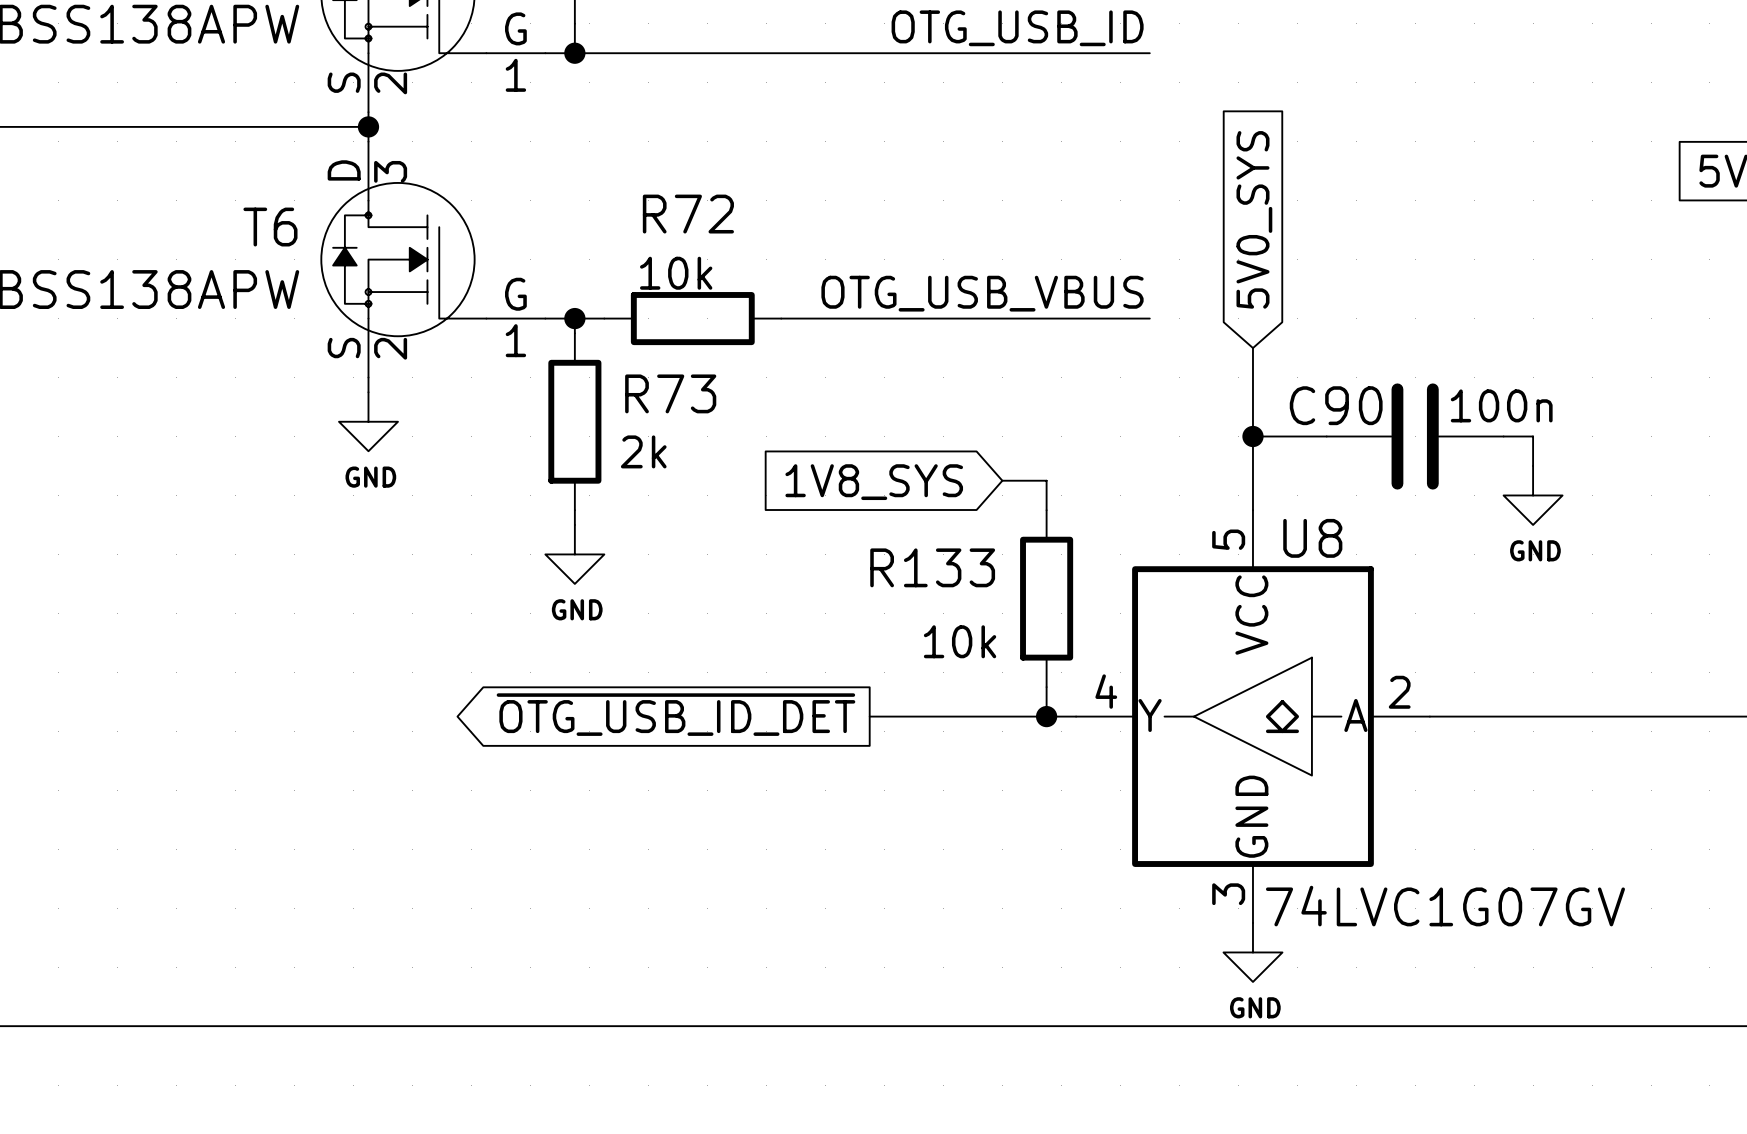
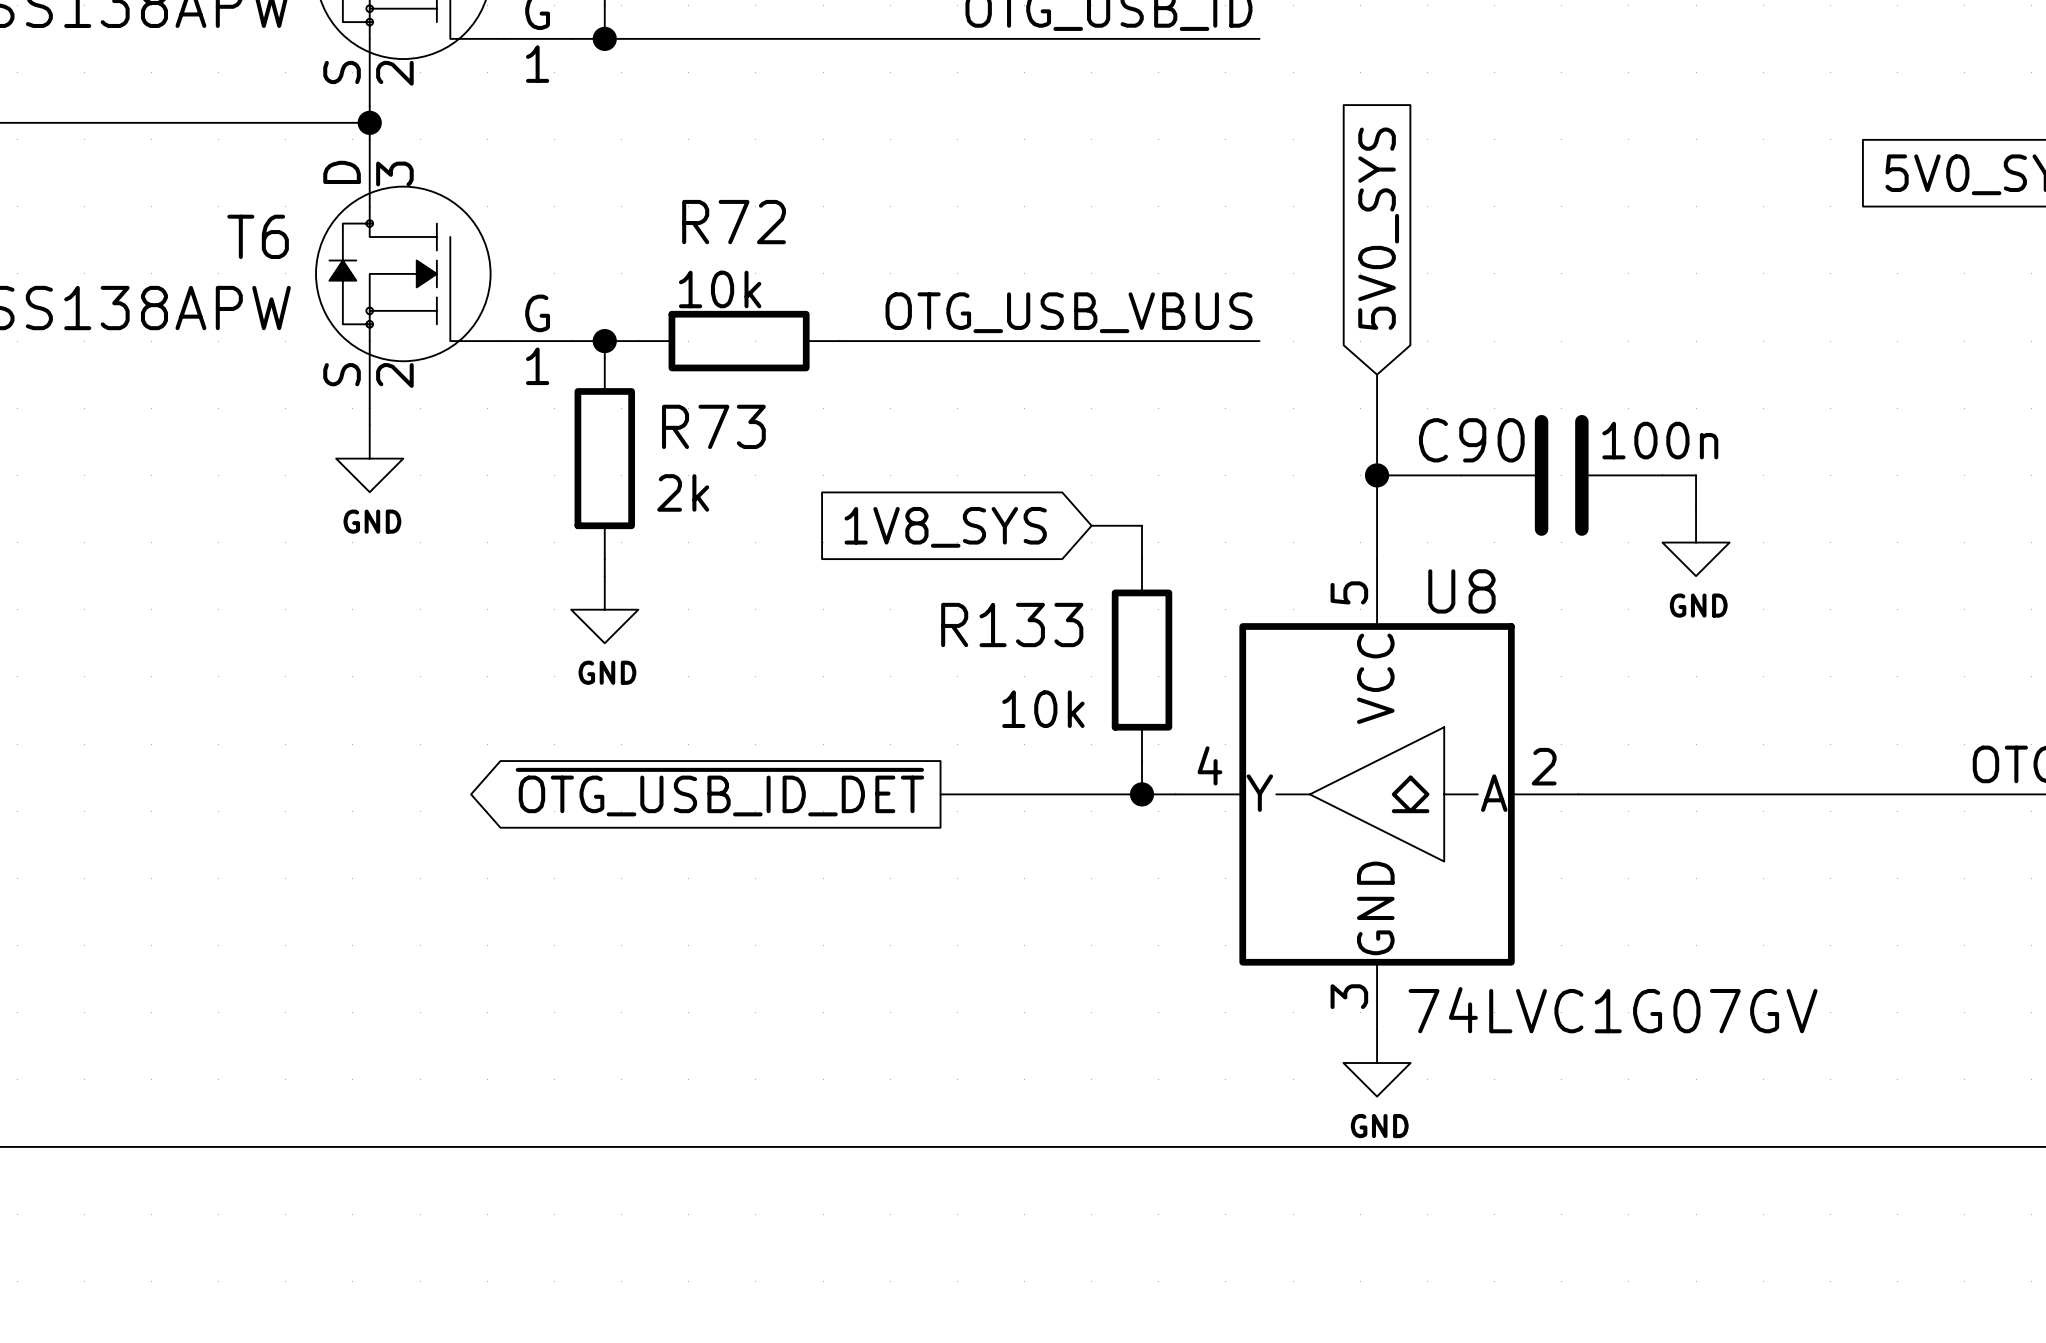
U8 name position: U8 (1312, 538) -> U8 (1461, 591)
U8 value position: 74LVC1G07GV (1445, 906) -> 74LVC1G07GV (1613, 1010)

